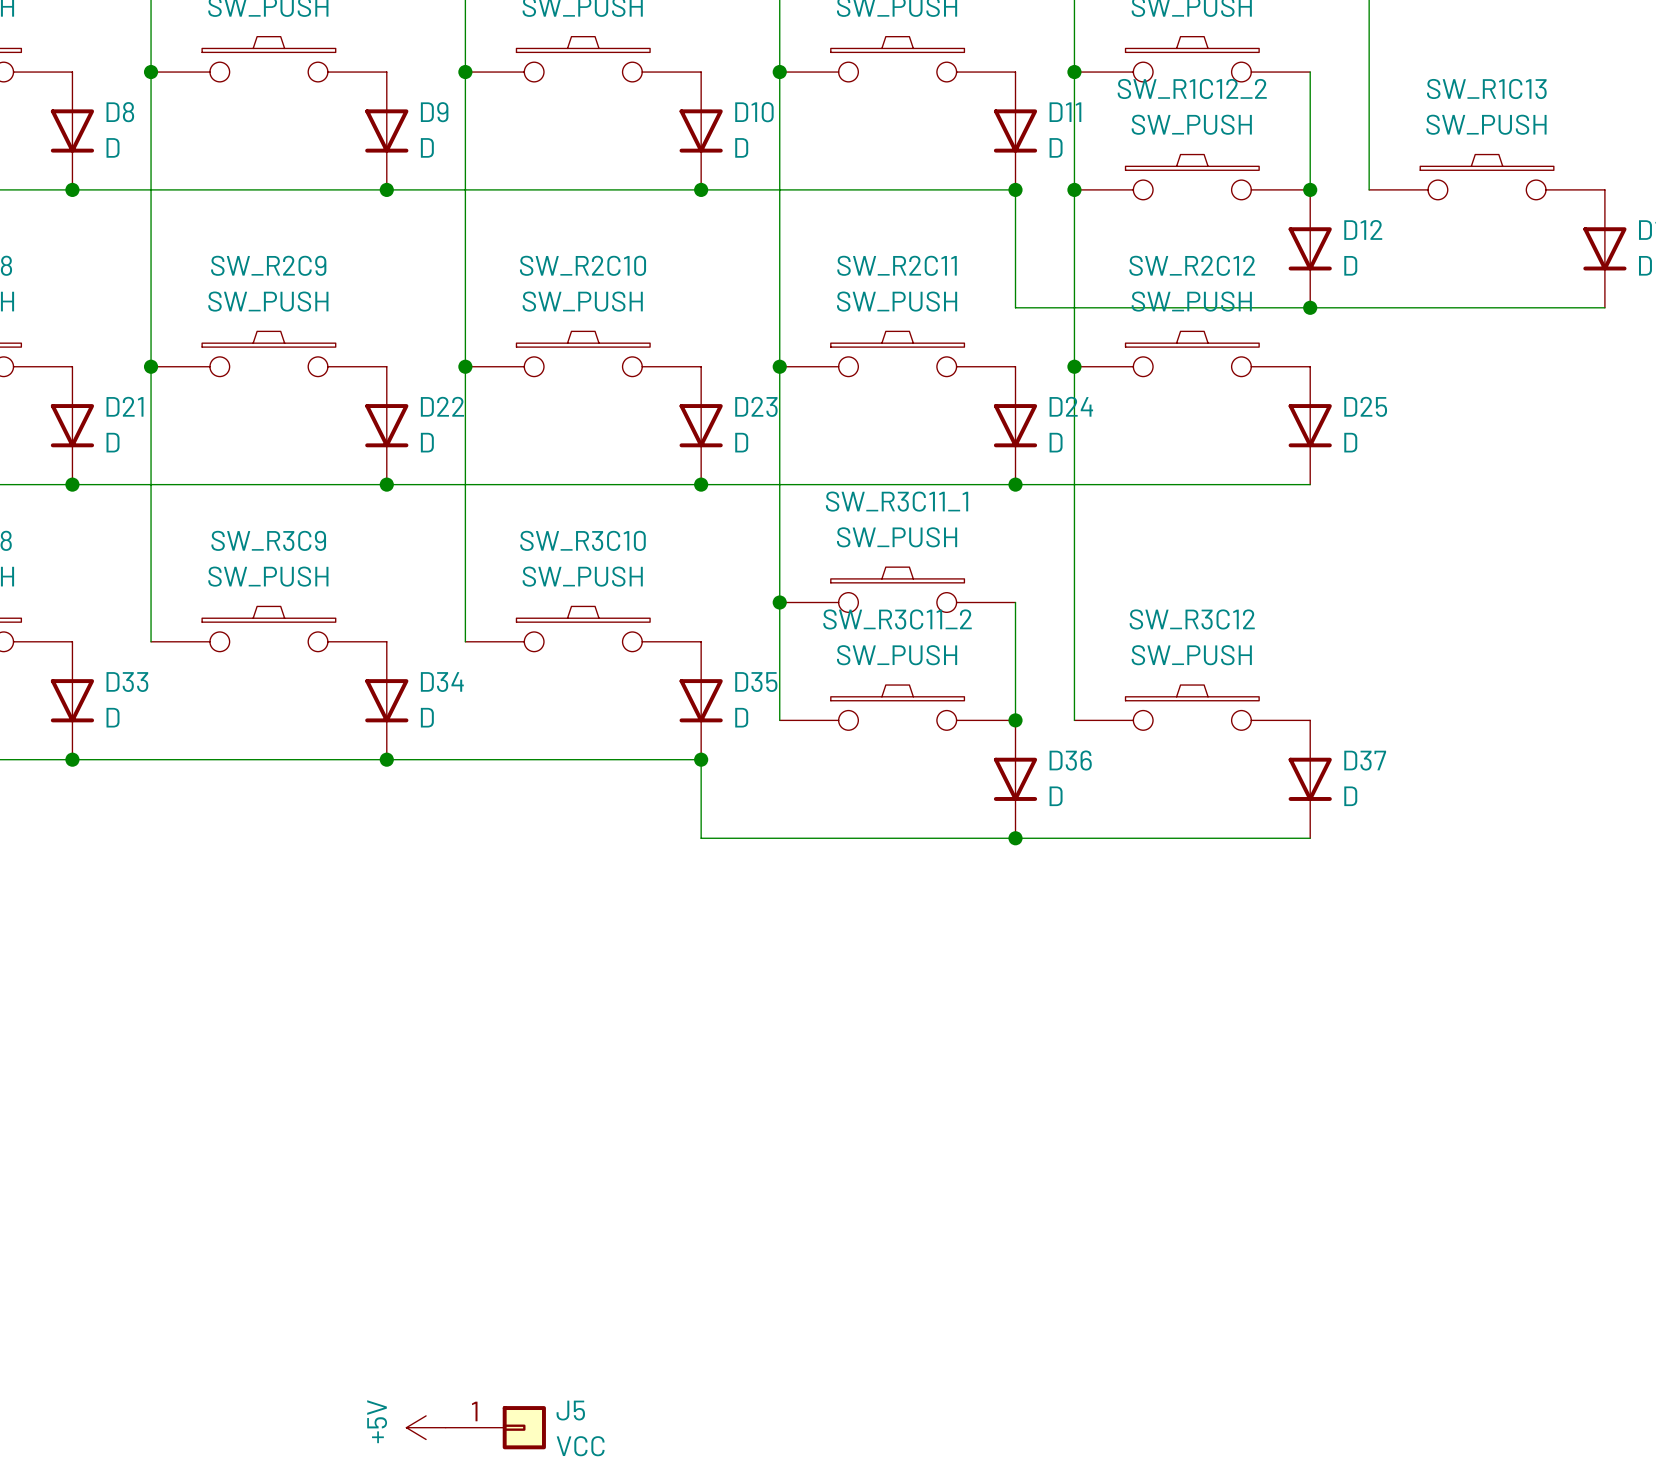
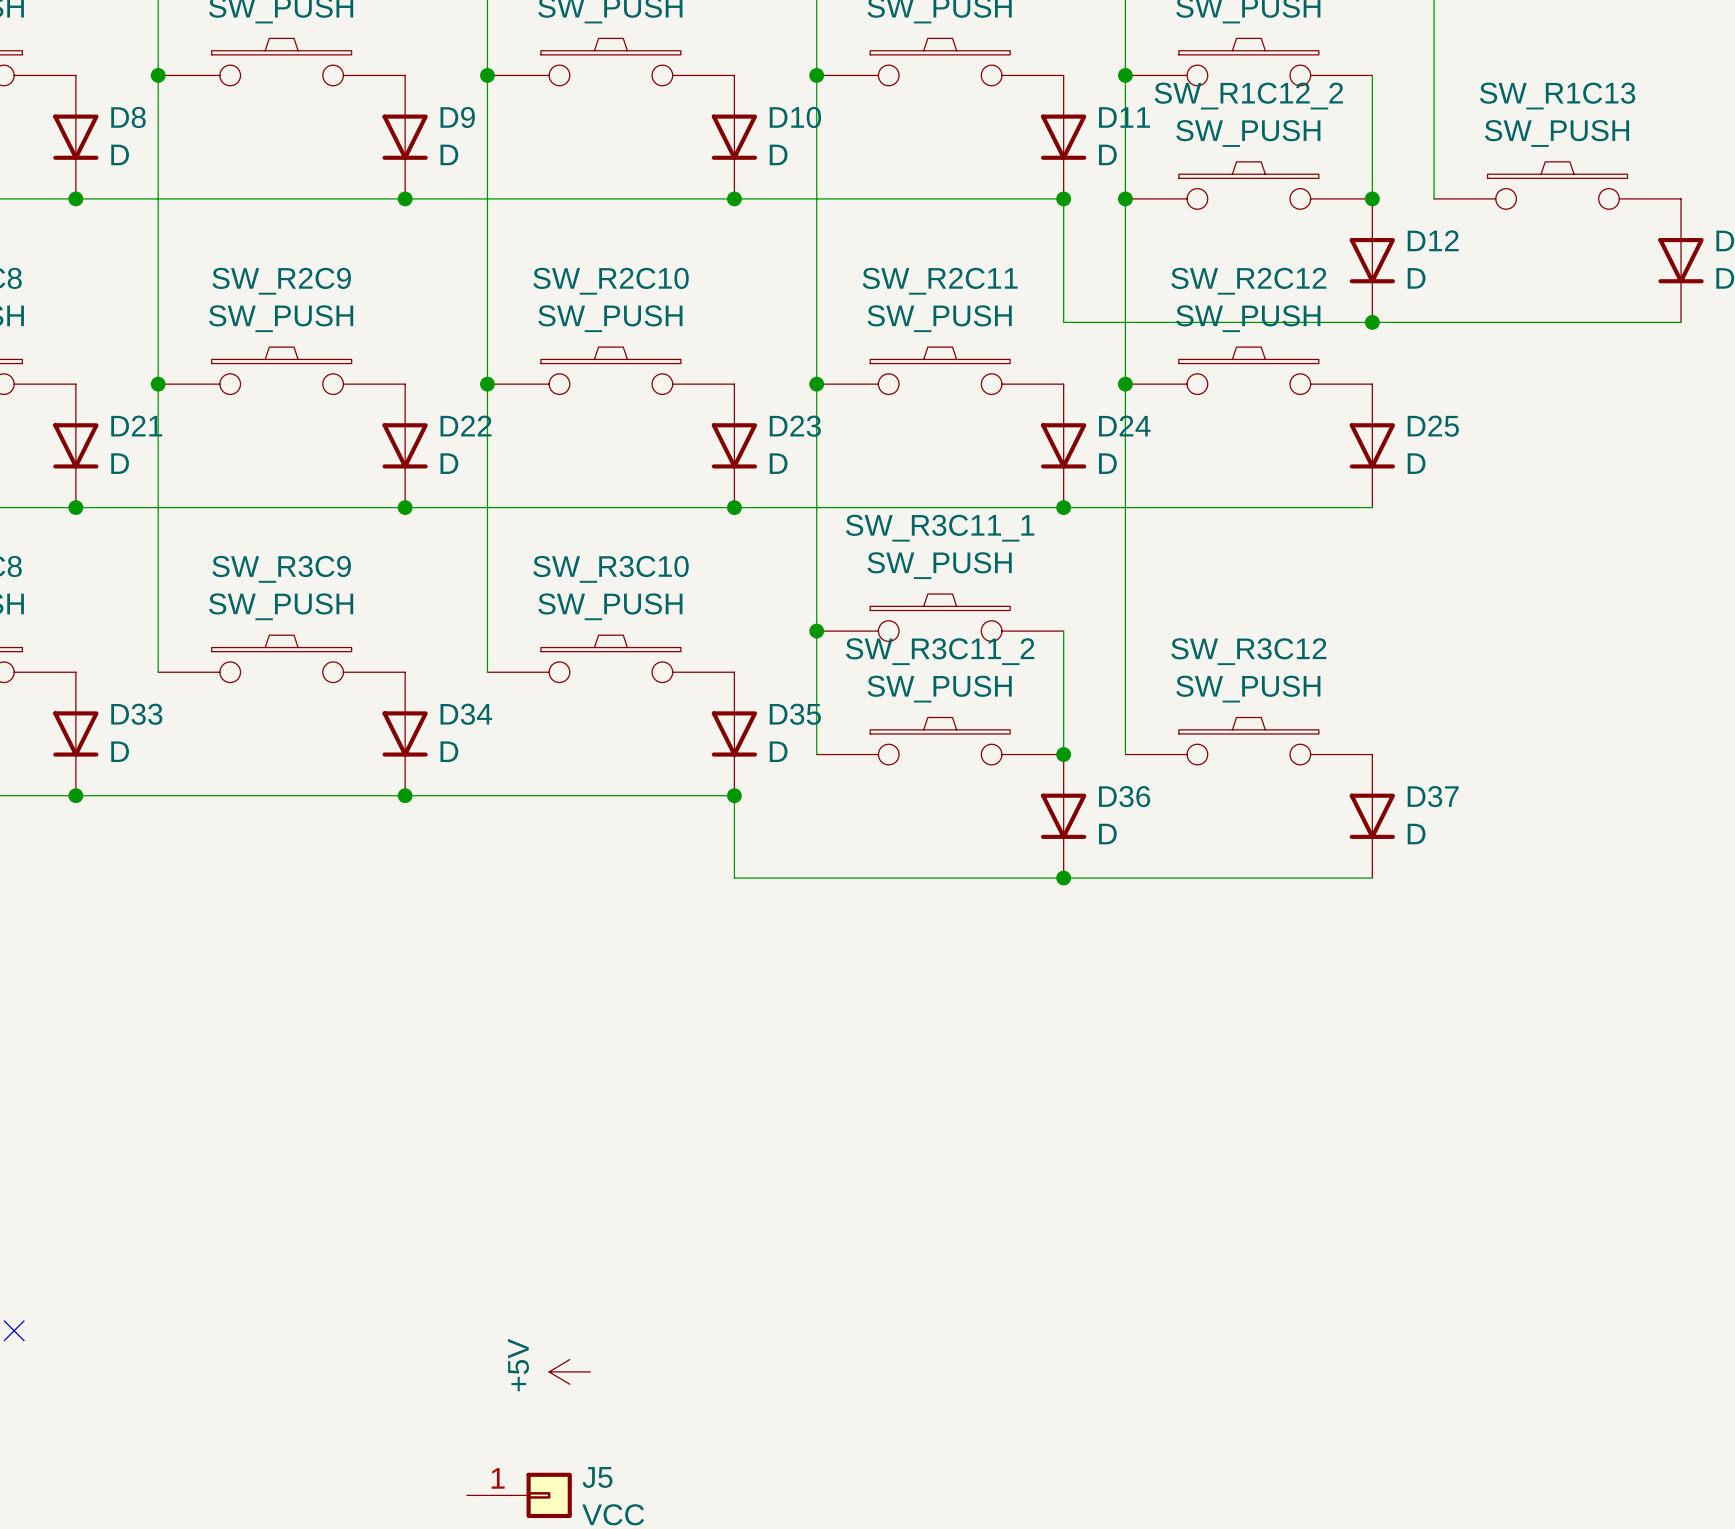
no-connect mark: none -> (14, 1330)
power symbol position: +5V (426, 1427) -> +5V (569, 1371)

